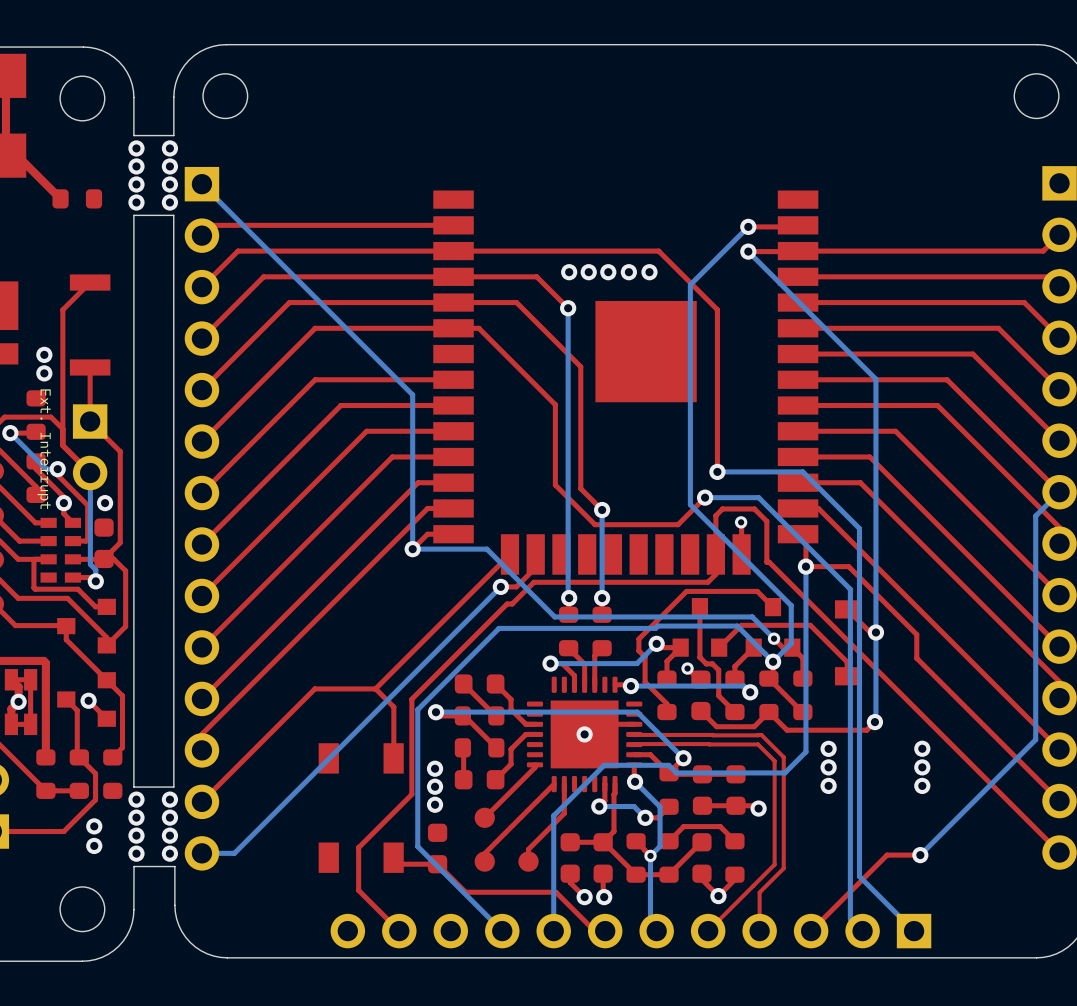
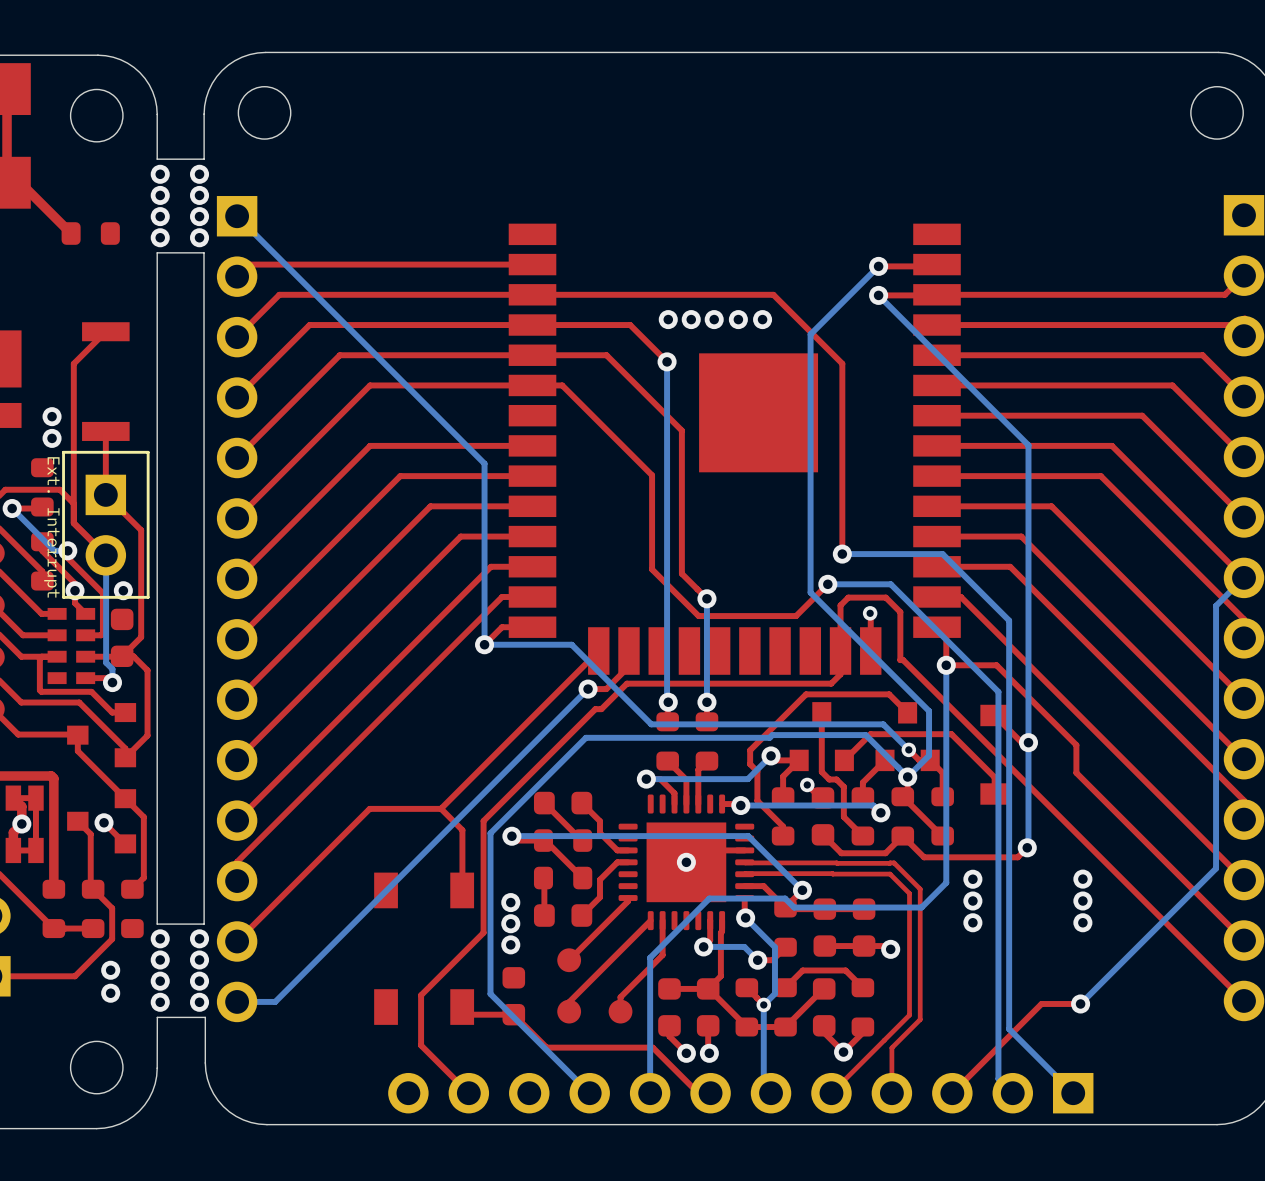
line: none -> (148, 452) (148, 597) (63, 597) (63, 452) (148, 452)

